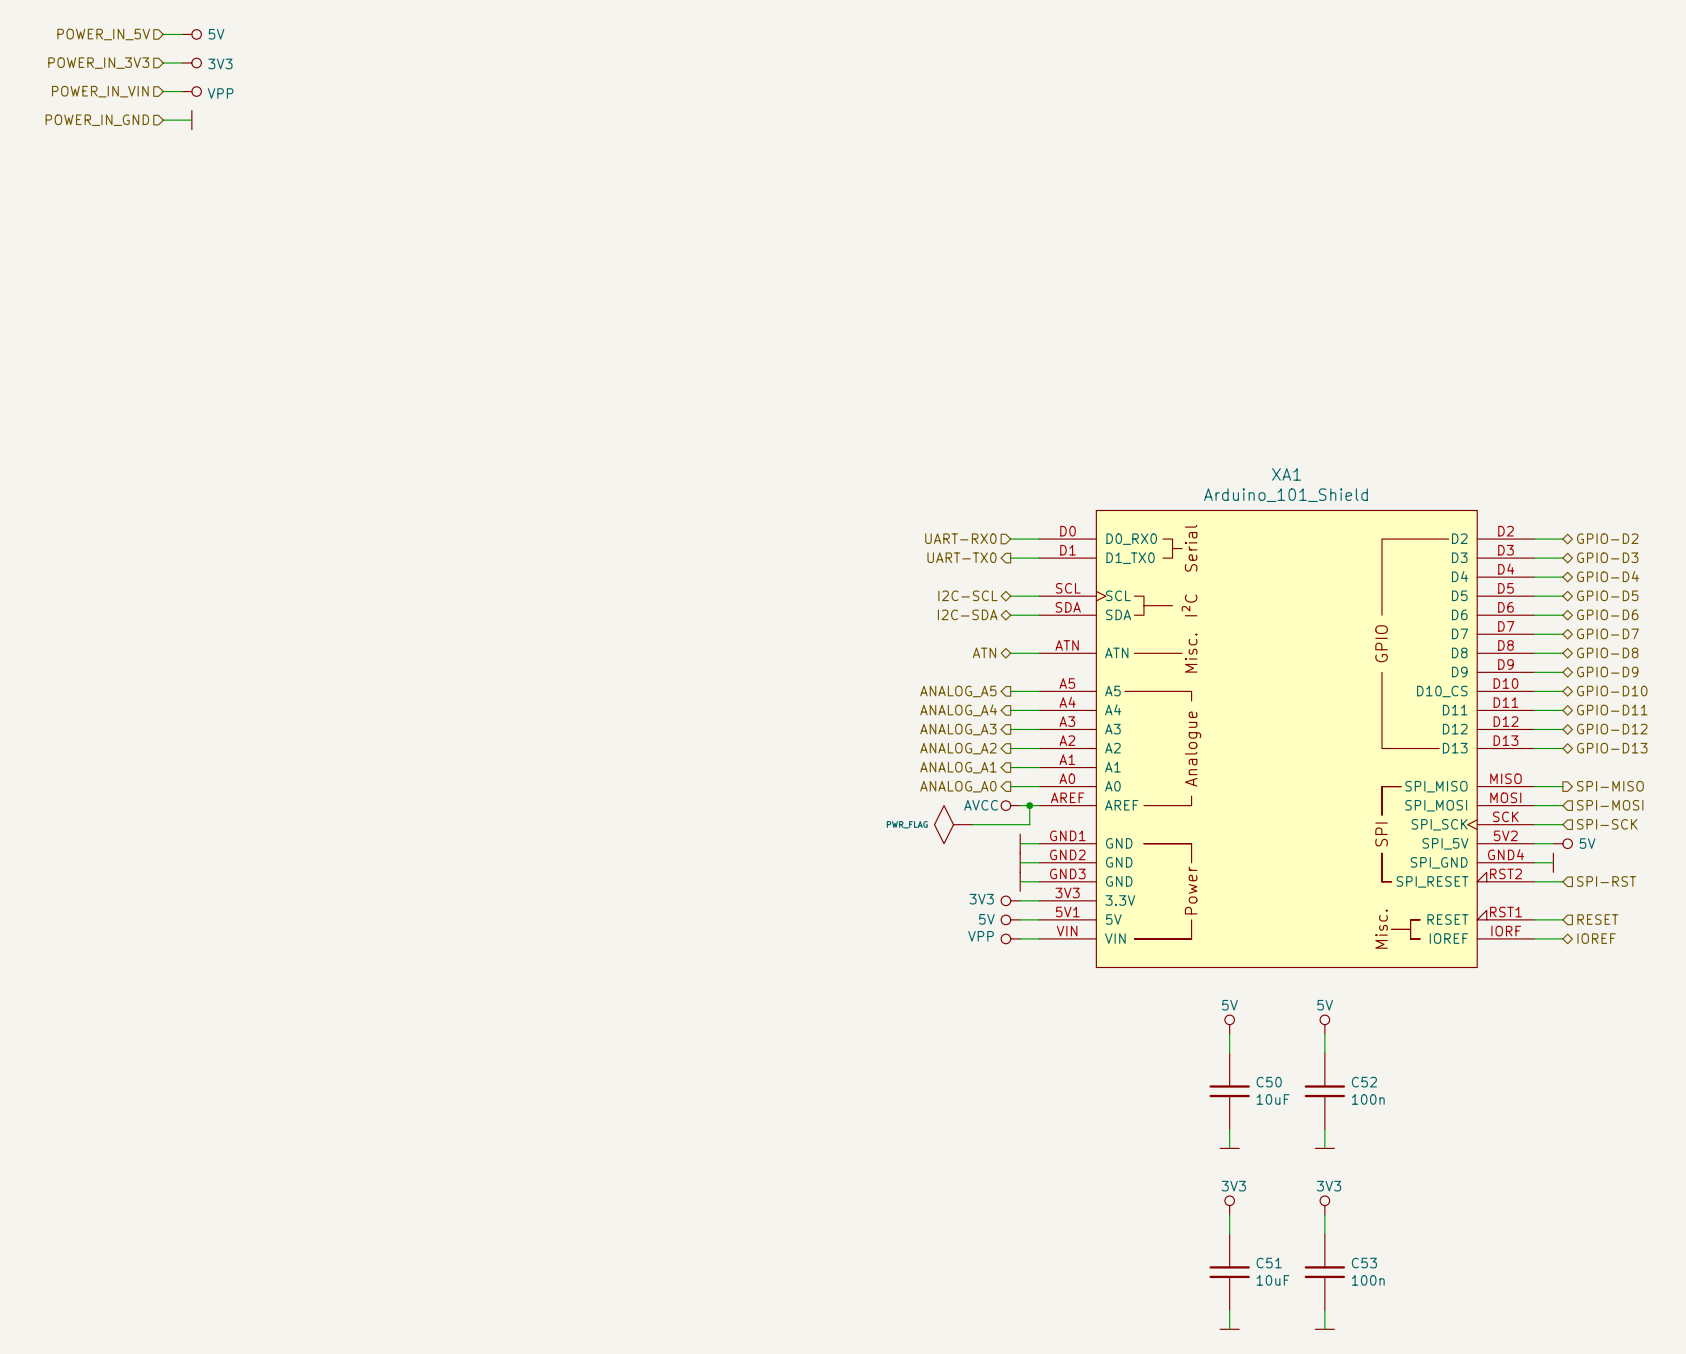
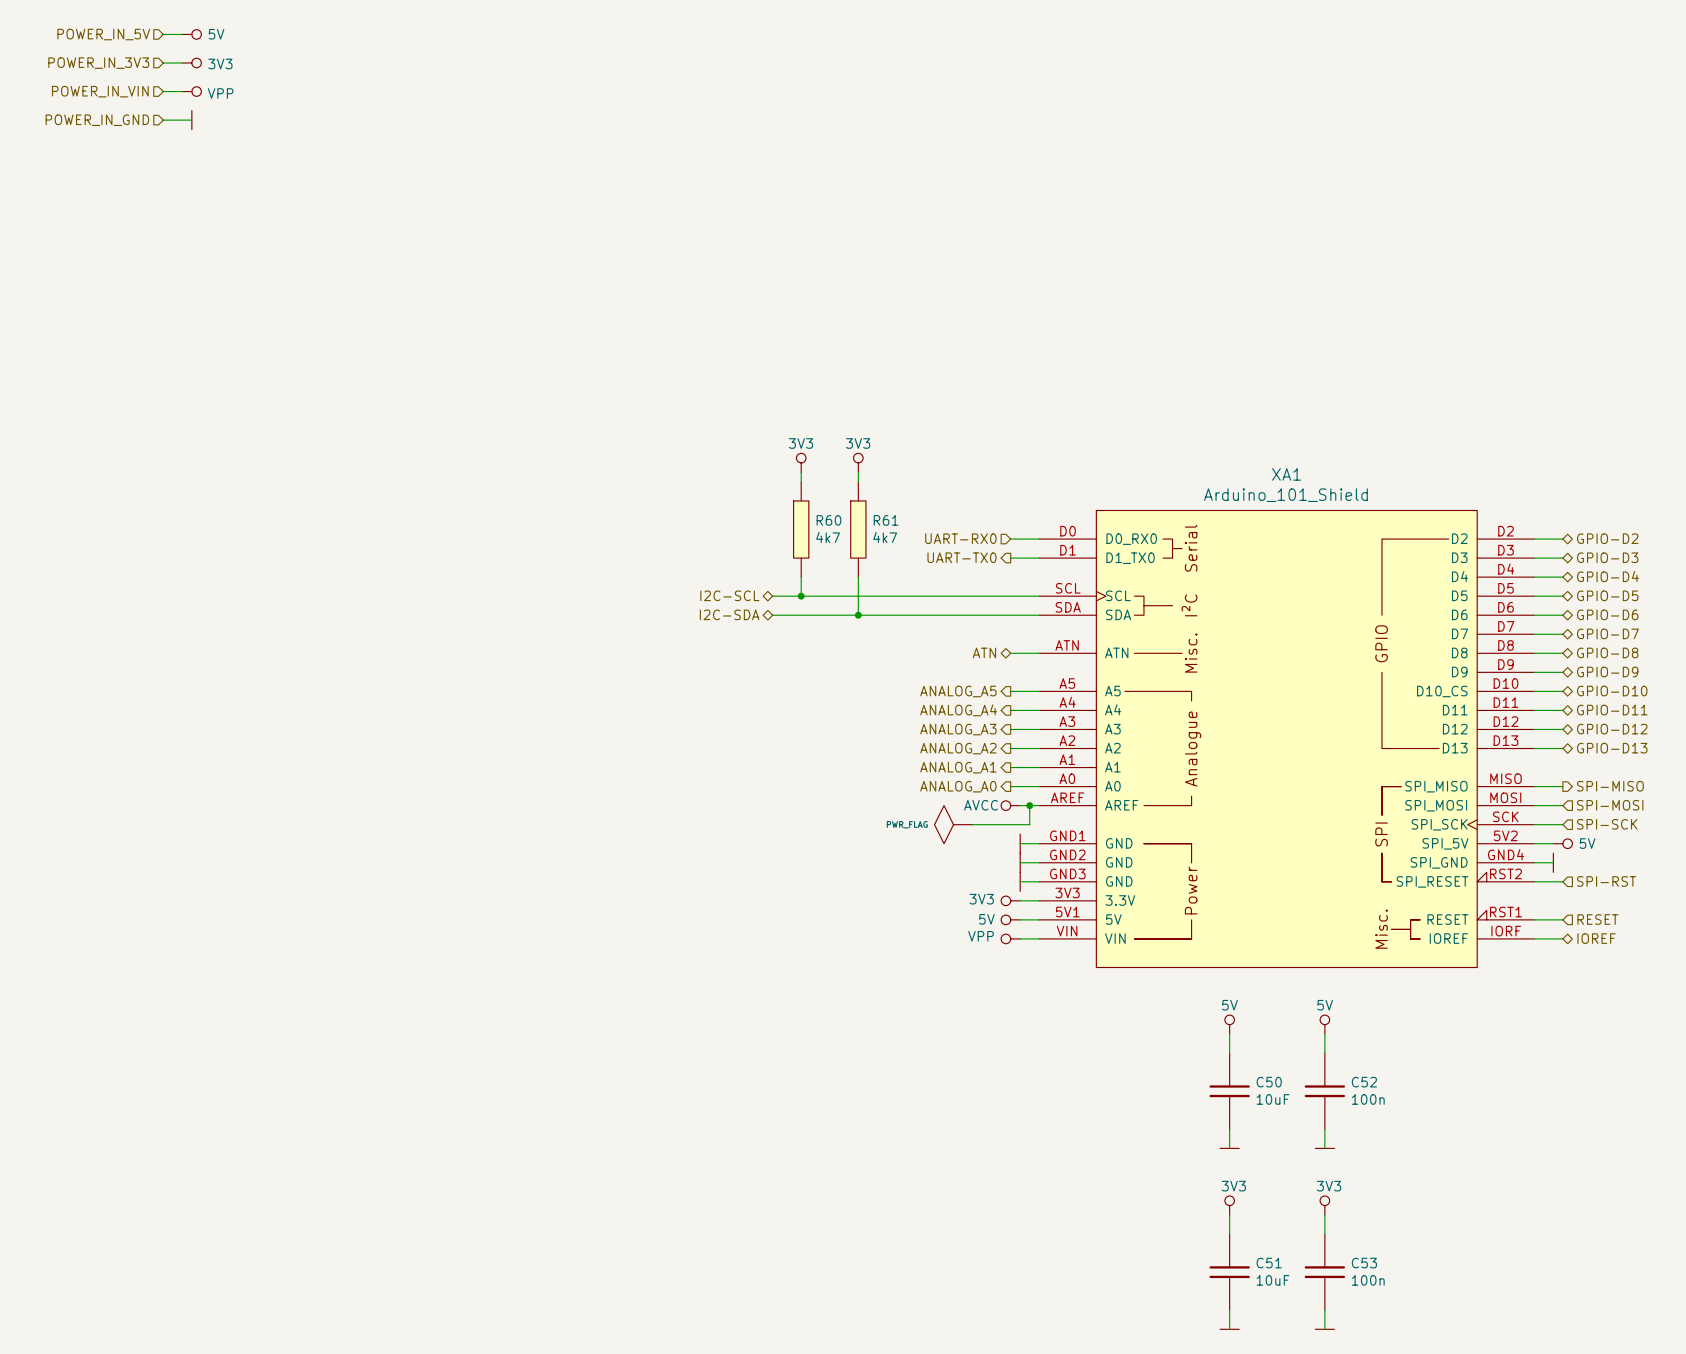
power symbol: none -> 3V3 (801, 462)
power symbol: none -> 3V3 (858, 462)
wire: none -> (801, 472) (801, 481)
wire: none -> (858, 472) (858, 481)
R60: none -> 4k7 (801, 529)
R61: none -> 4k7 (858, 529)
wire: none -> (801, 577) (801, 596)
wire: none -> (858, 577) (858, 615)
hierarchical label: none -> I2C-SCL (729, 595)
hierarchical label: I2C-SCL (967, 595) -> none
wire: none -> (772, 596) (1010, 596)
junction: none -> (801, 596)
hierarchical label: none -> I2C-SDA (729, 614)
hierarchical label: I2C-SDA (967, 614) -> none
wire: none -> (772, 615) (1010, 615)
junction: none -> (858, 615)

